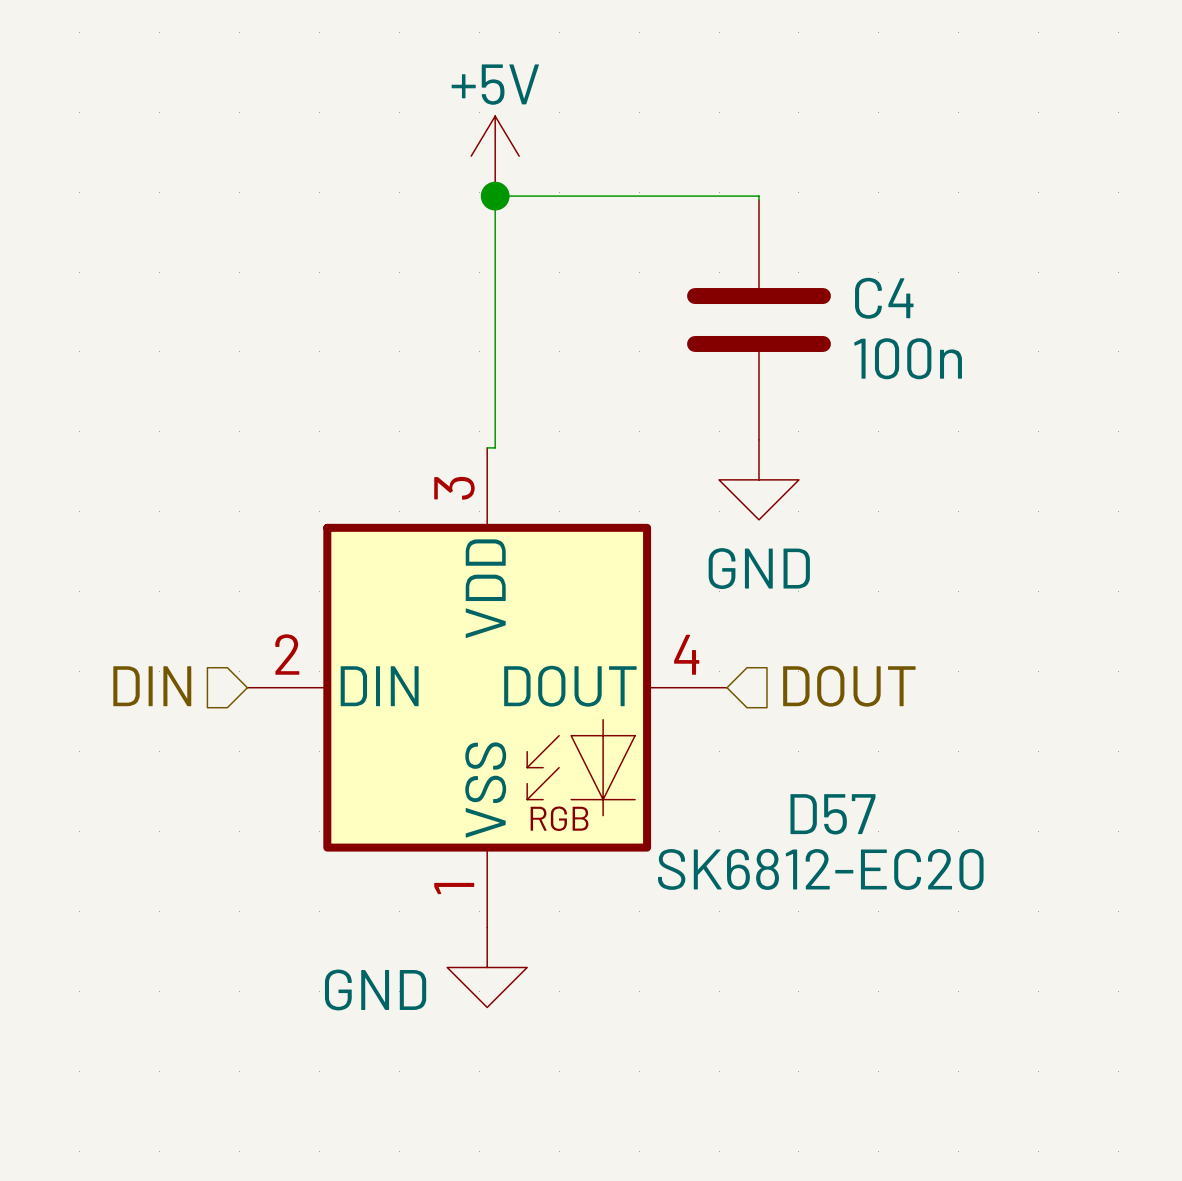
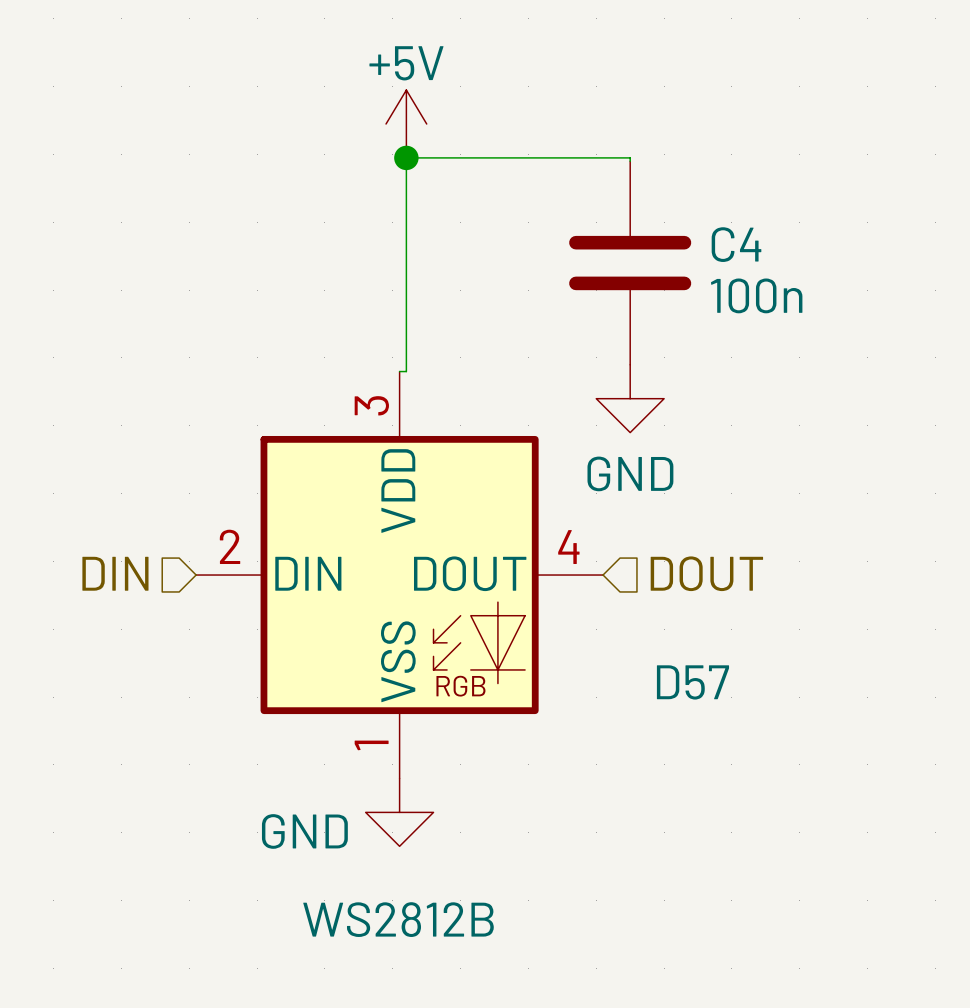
D57 value: SK6812-EC20 (820, 869) -> WS2812B (398, 919)

